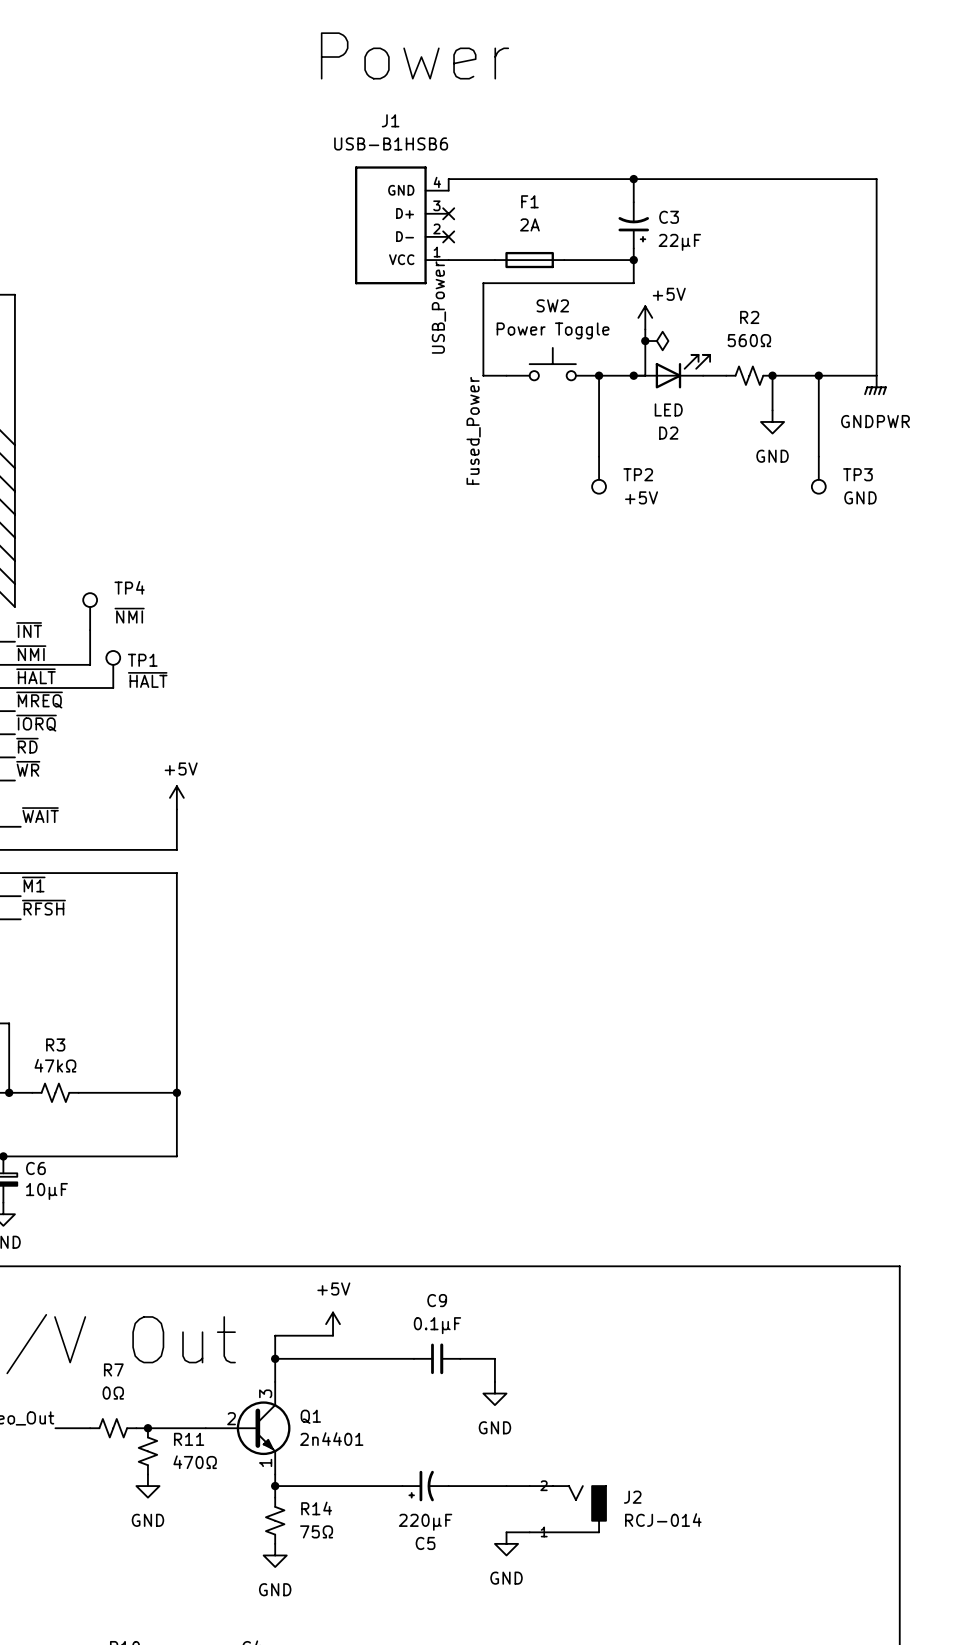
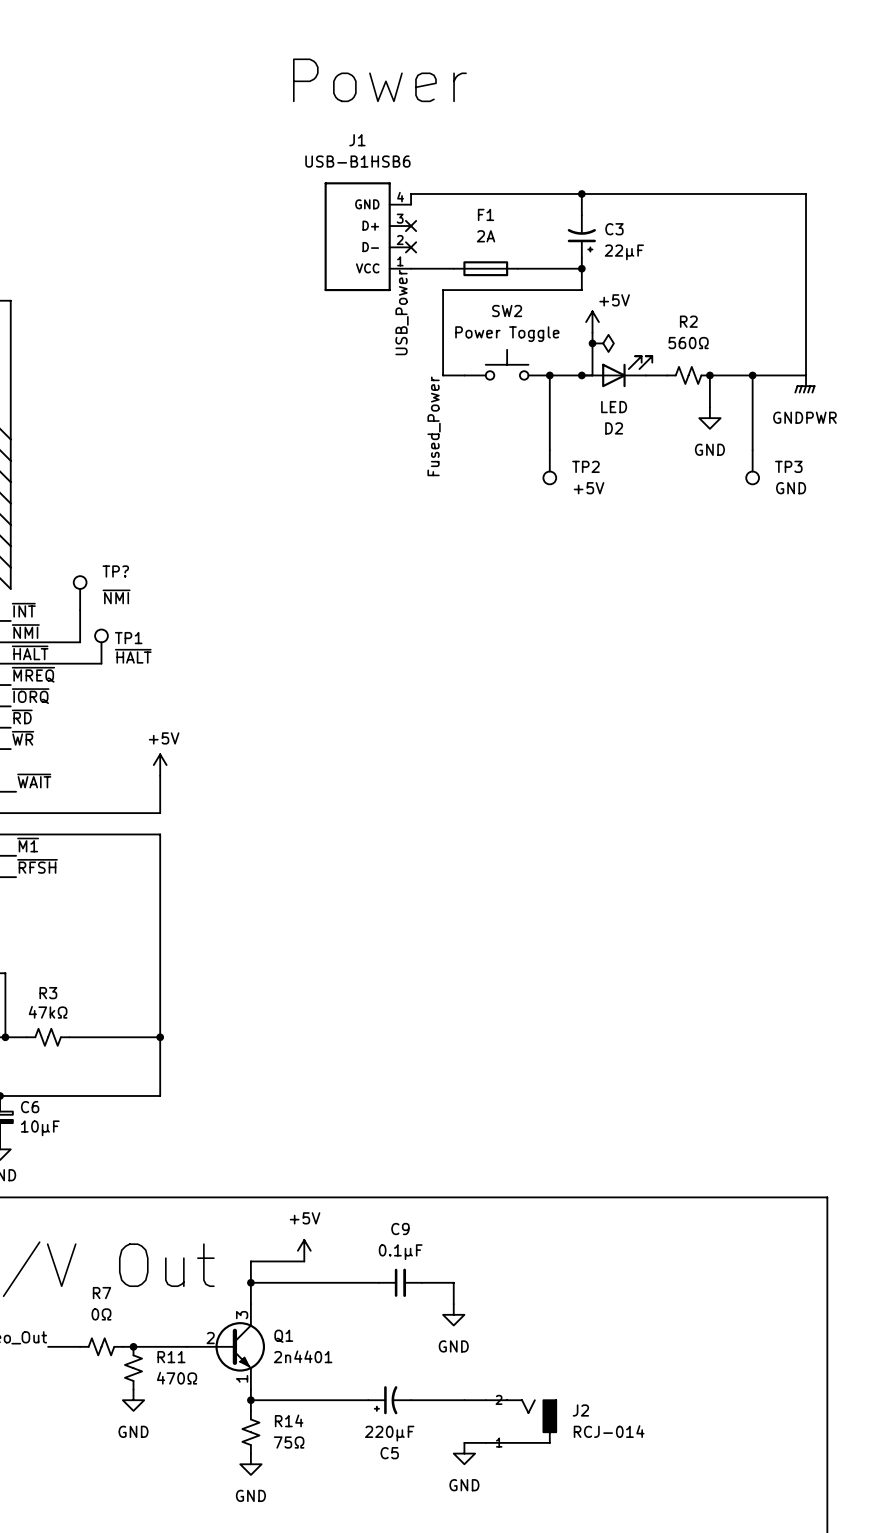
TP4 name: TP4 (129, 587) -> TP? (115, 571)

